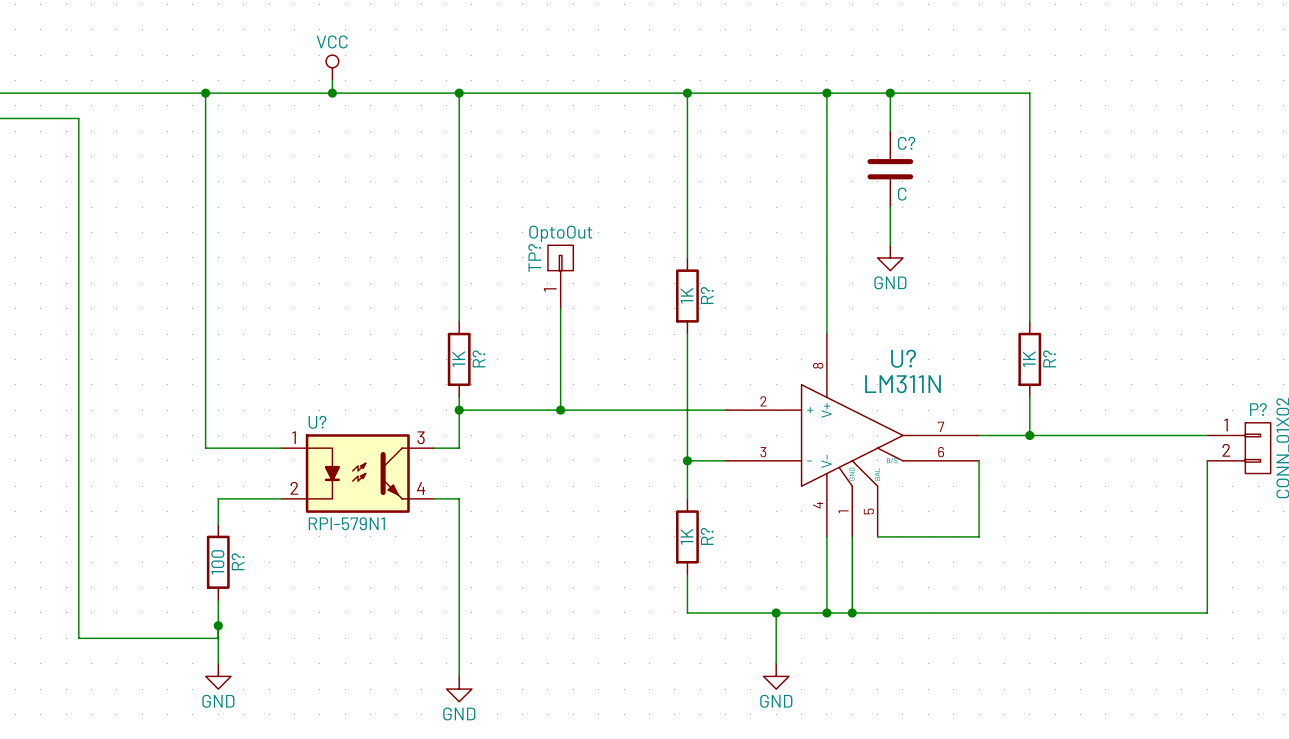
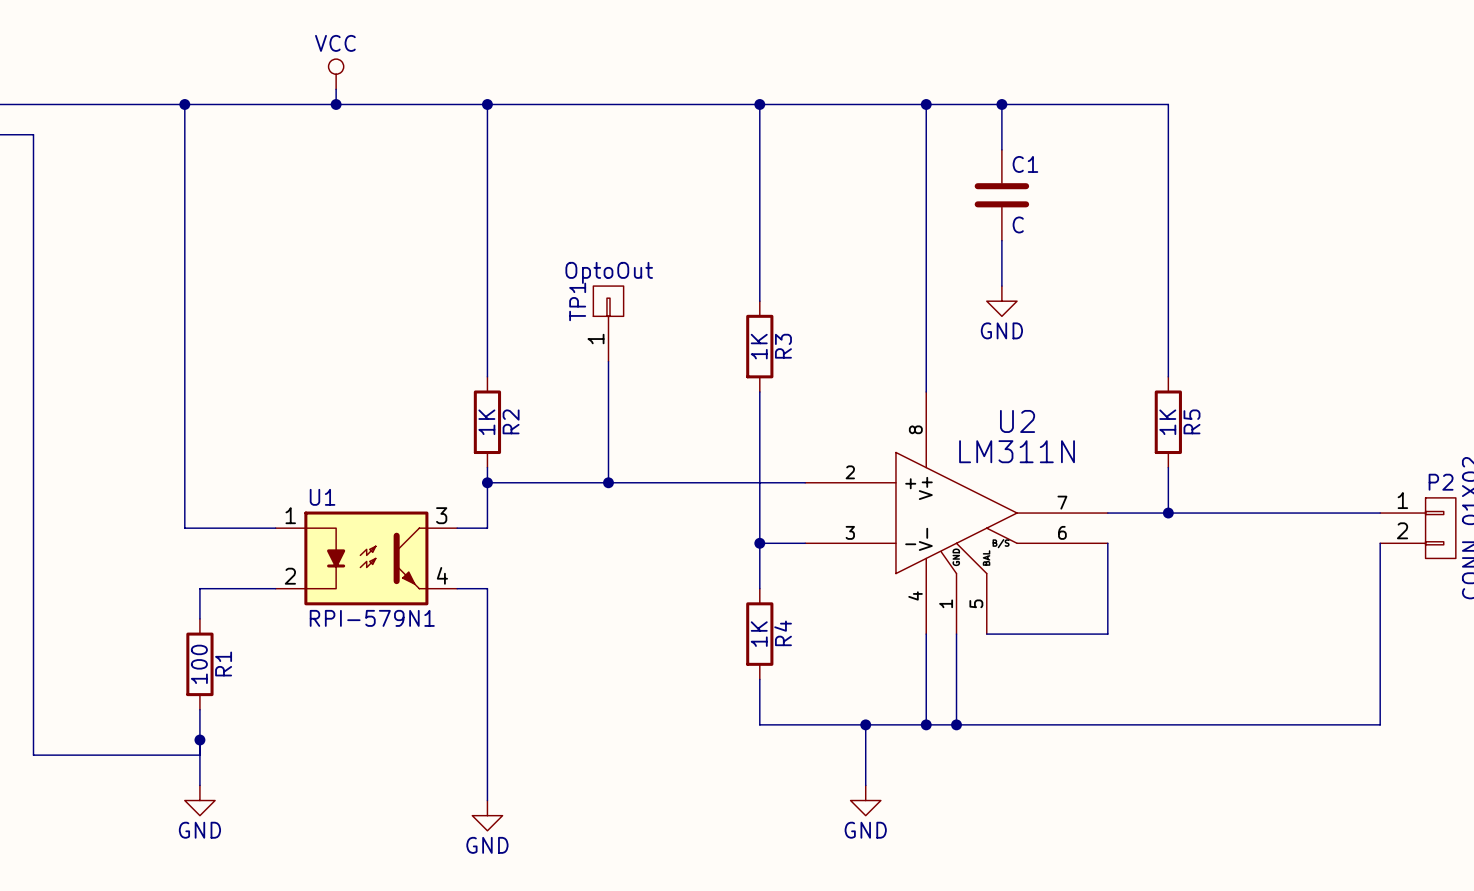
C? name: C? (906, 143) -> C1 (1025, 164)
TP? name: TP? (534, 257) -> TP1 (577, 301)
R? name: R? (707, 295) -> R3 (783, 346)
R? name: R? (478, 358) -> R2 (511, 421)
U? name: U? (903, 358) -> U2 (1017, 421)
R? name: R? (1049, 358) -> R5 (1191, 421)
P? name: P? (1258, 409) -> P2 (1441, 482)
U? name: U? (317, 422) -> U1 (322, 497)
R? name: R? (707, 536) -> R4 (783, 633)
R? name: R? (238, 561) -> R1 (223, 663)

